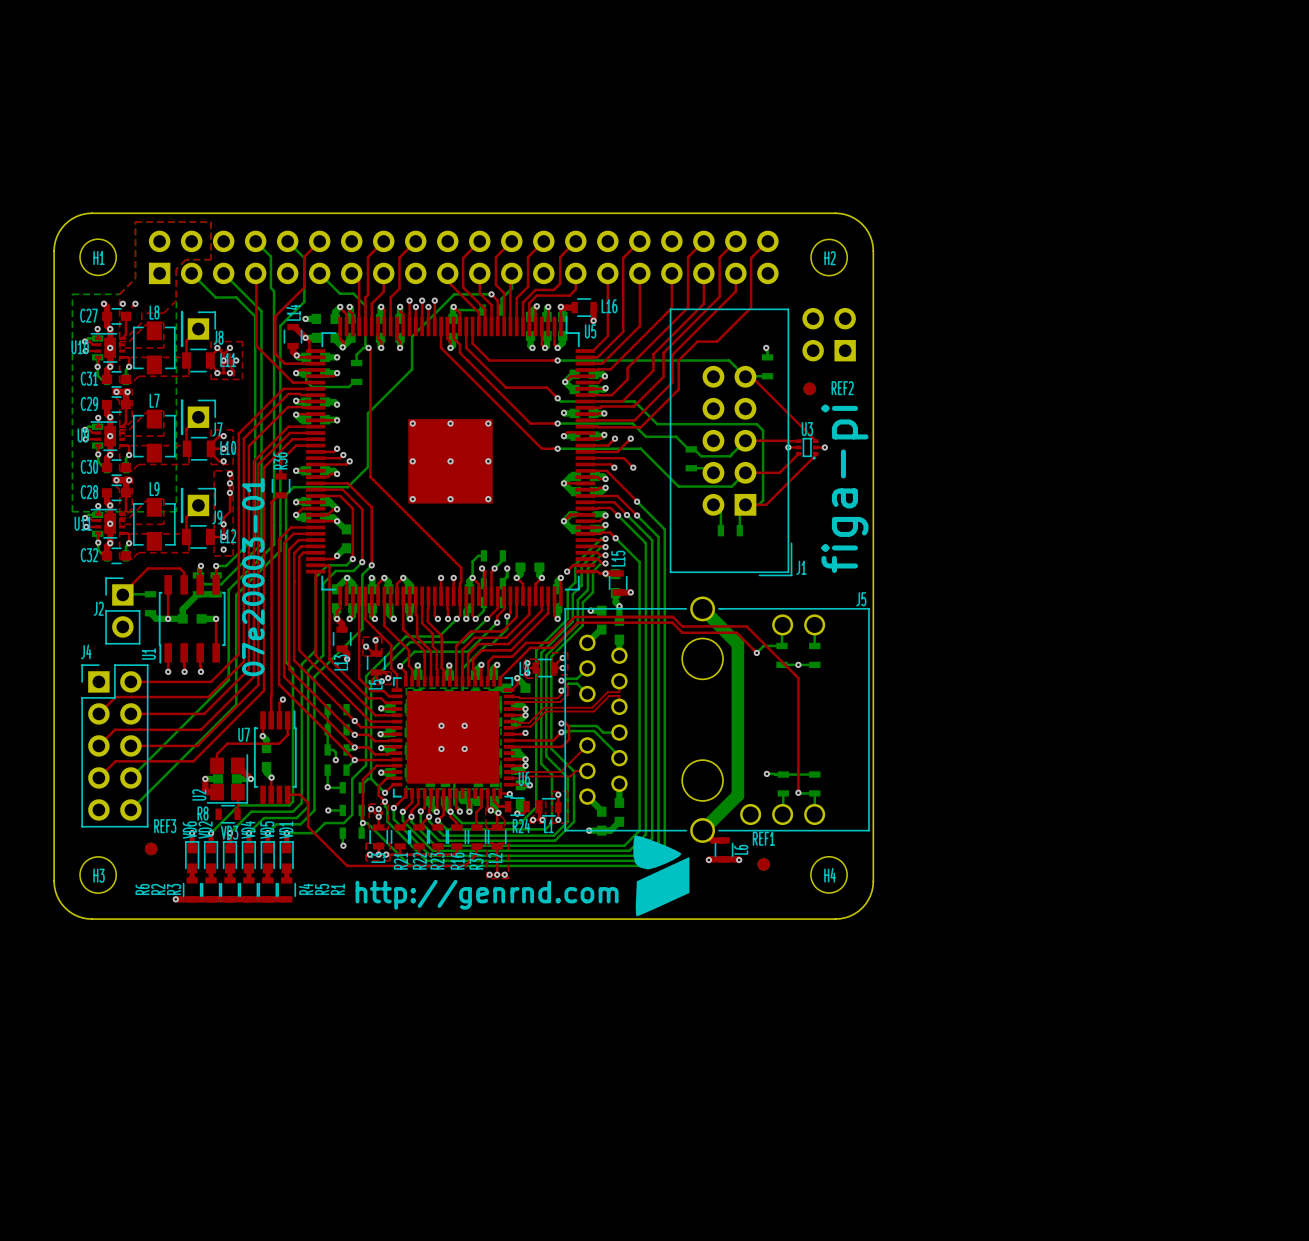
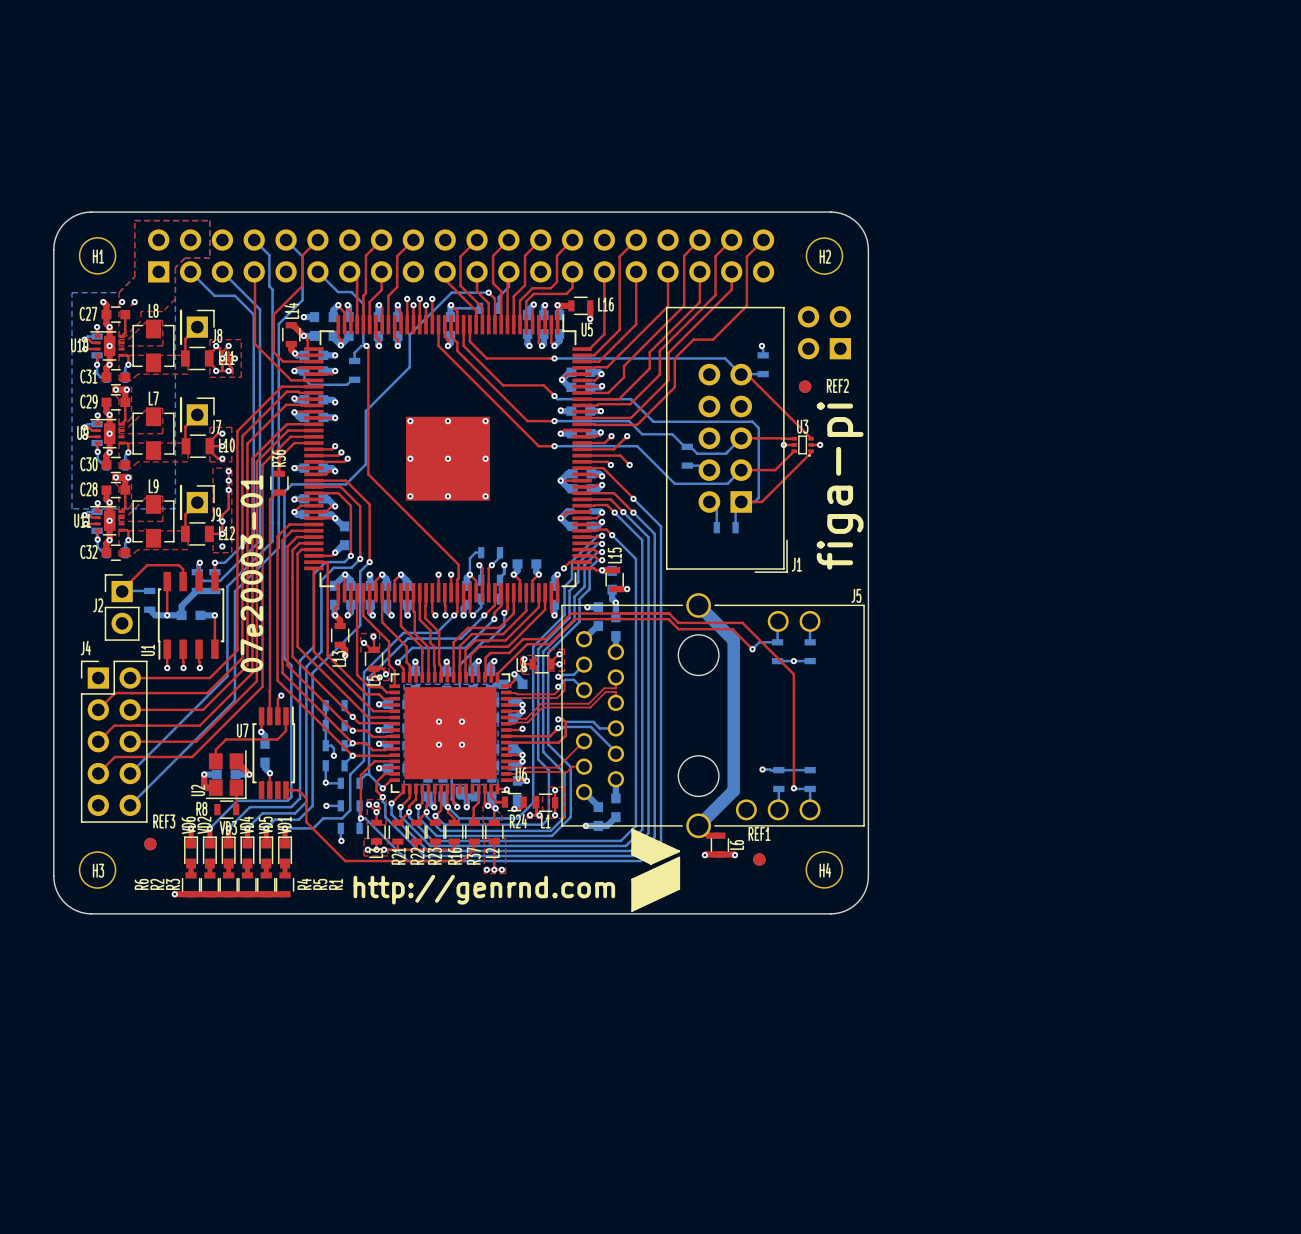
drawing: none -> [631, 828, 681, 912]
drawing: [633, 835, 690, 917] -> none

